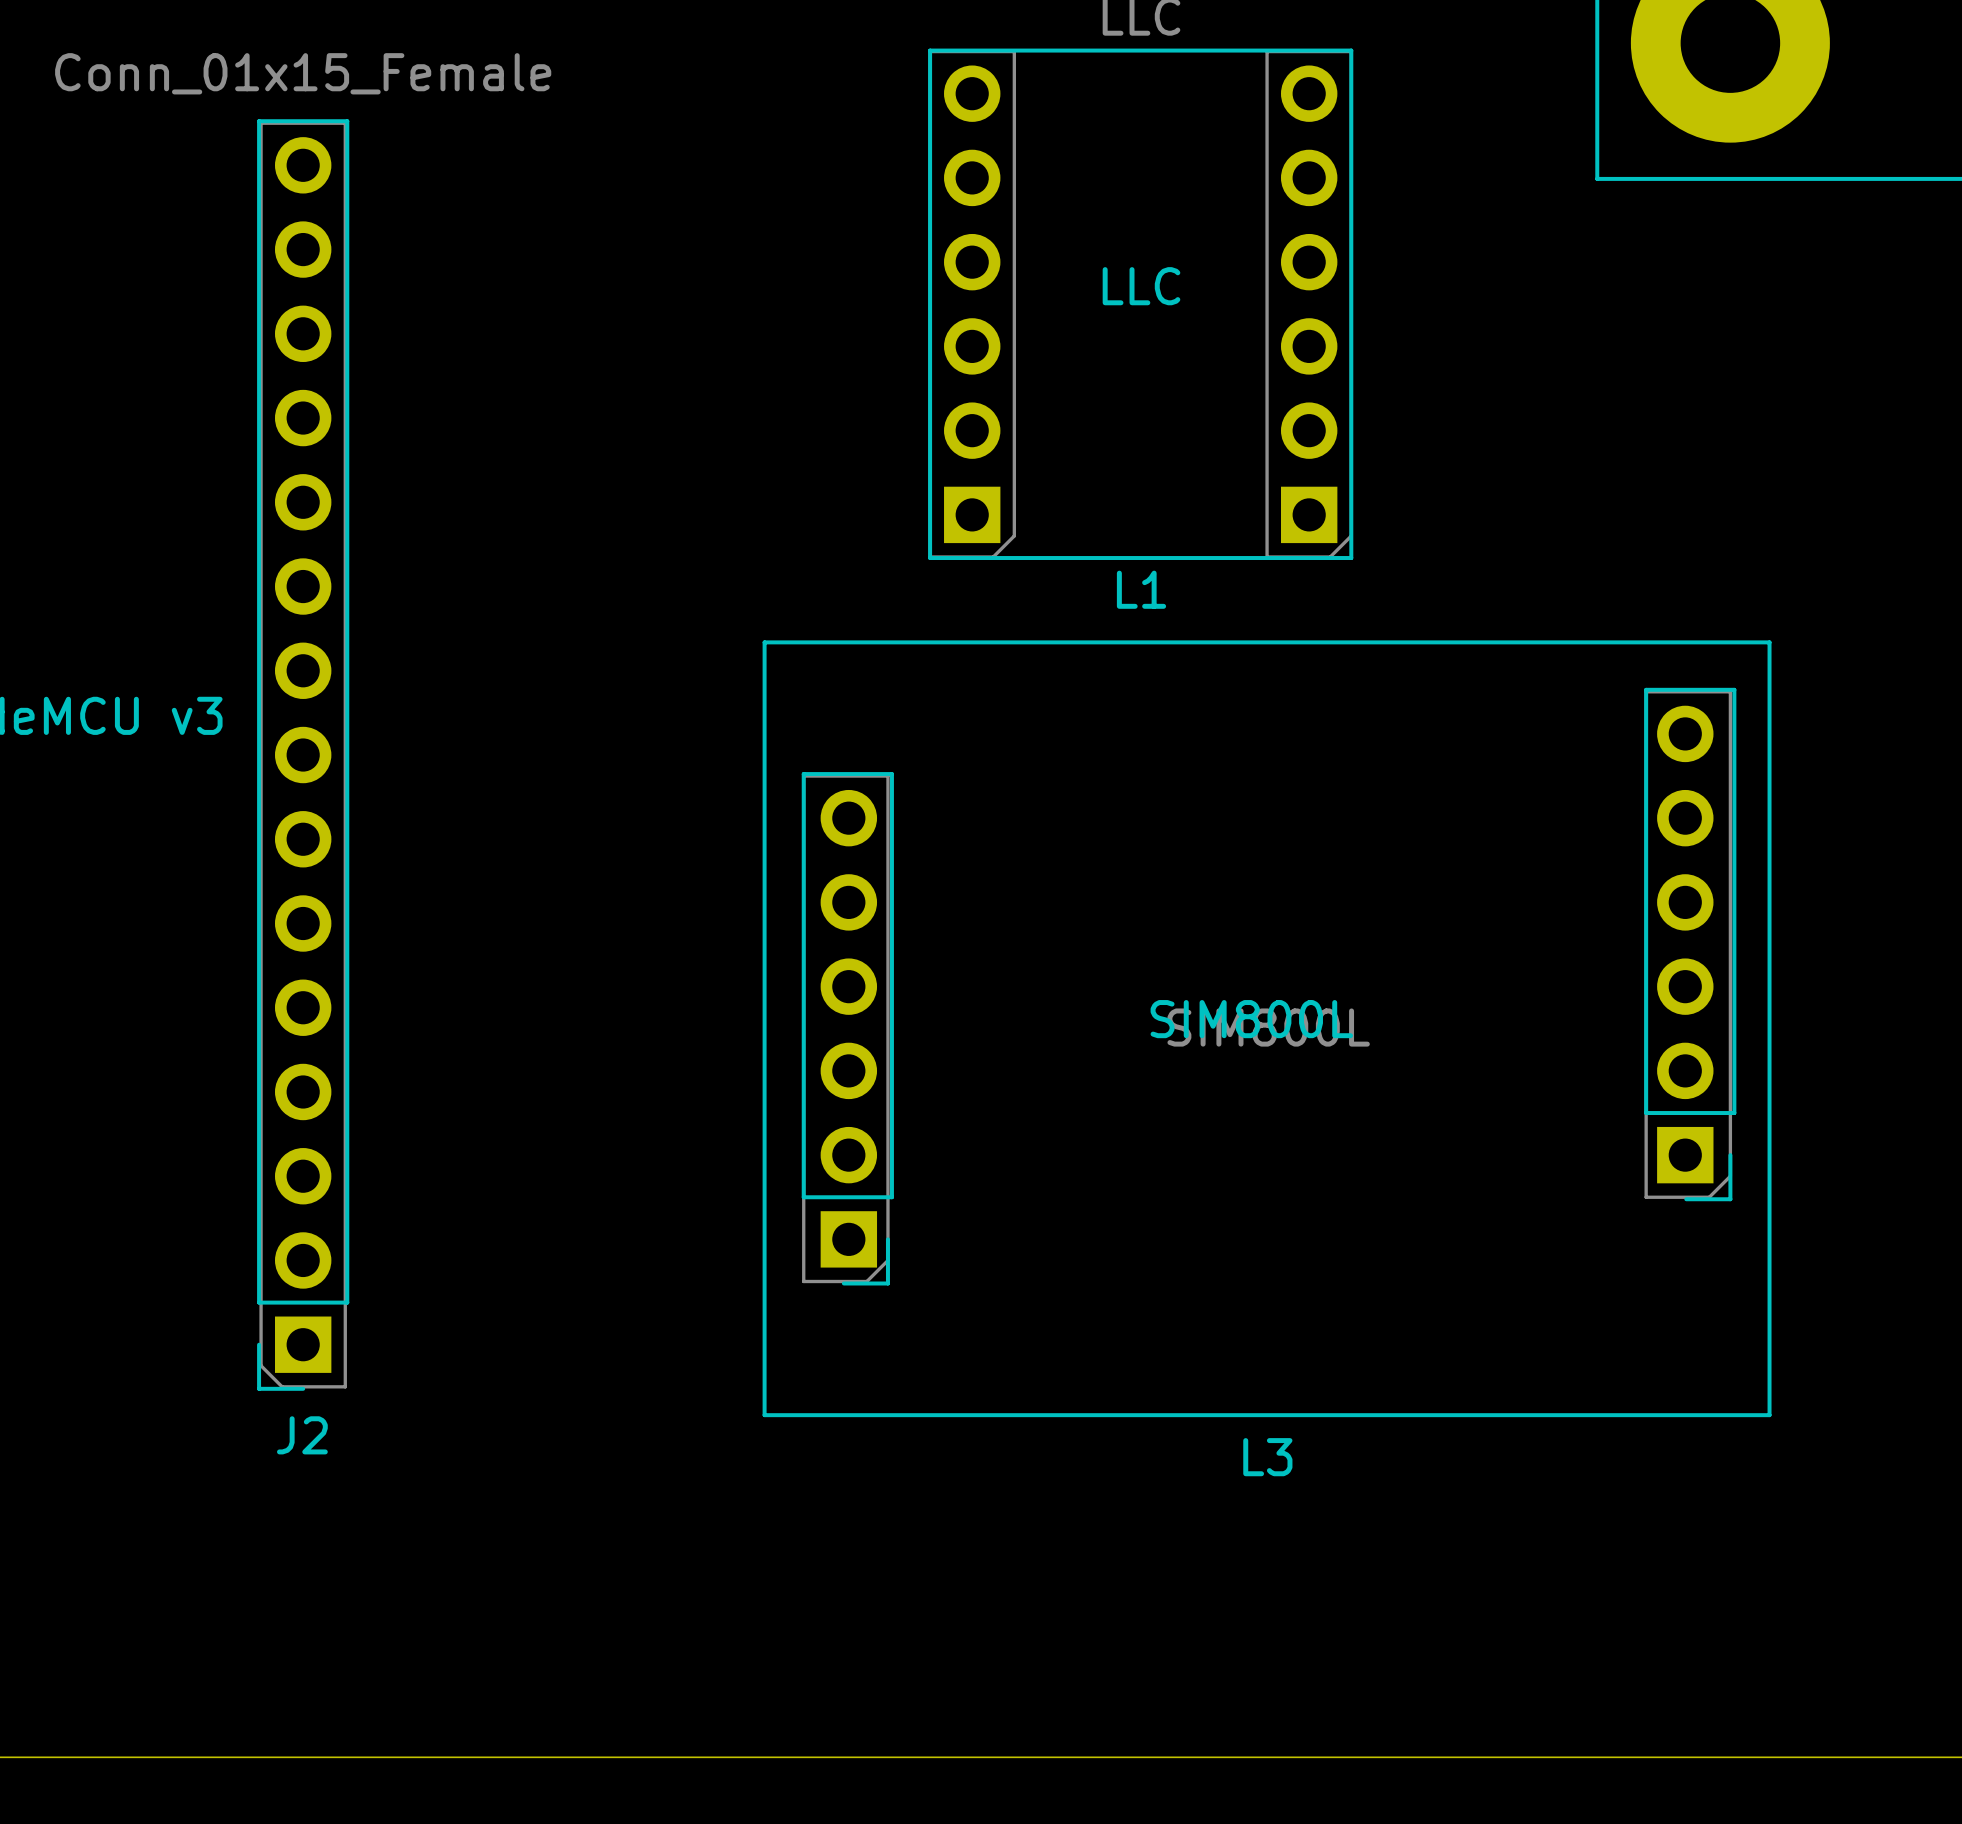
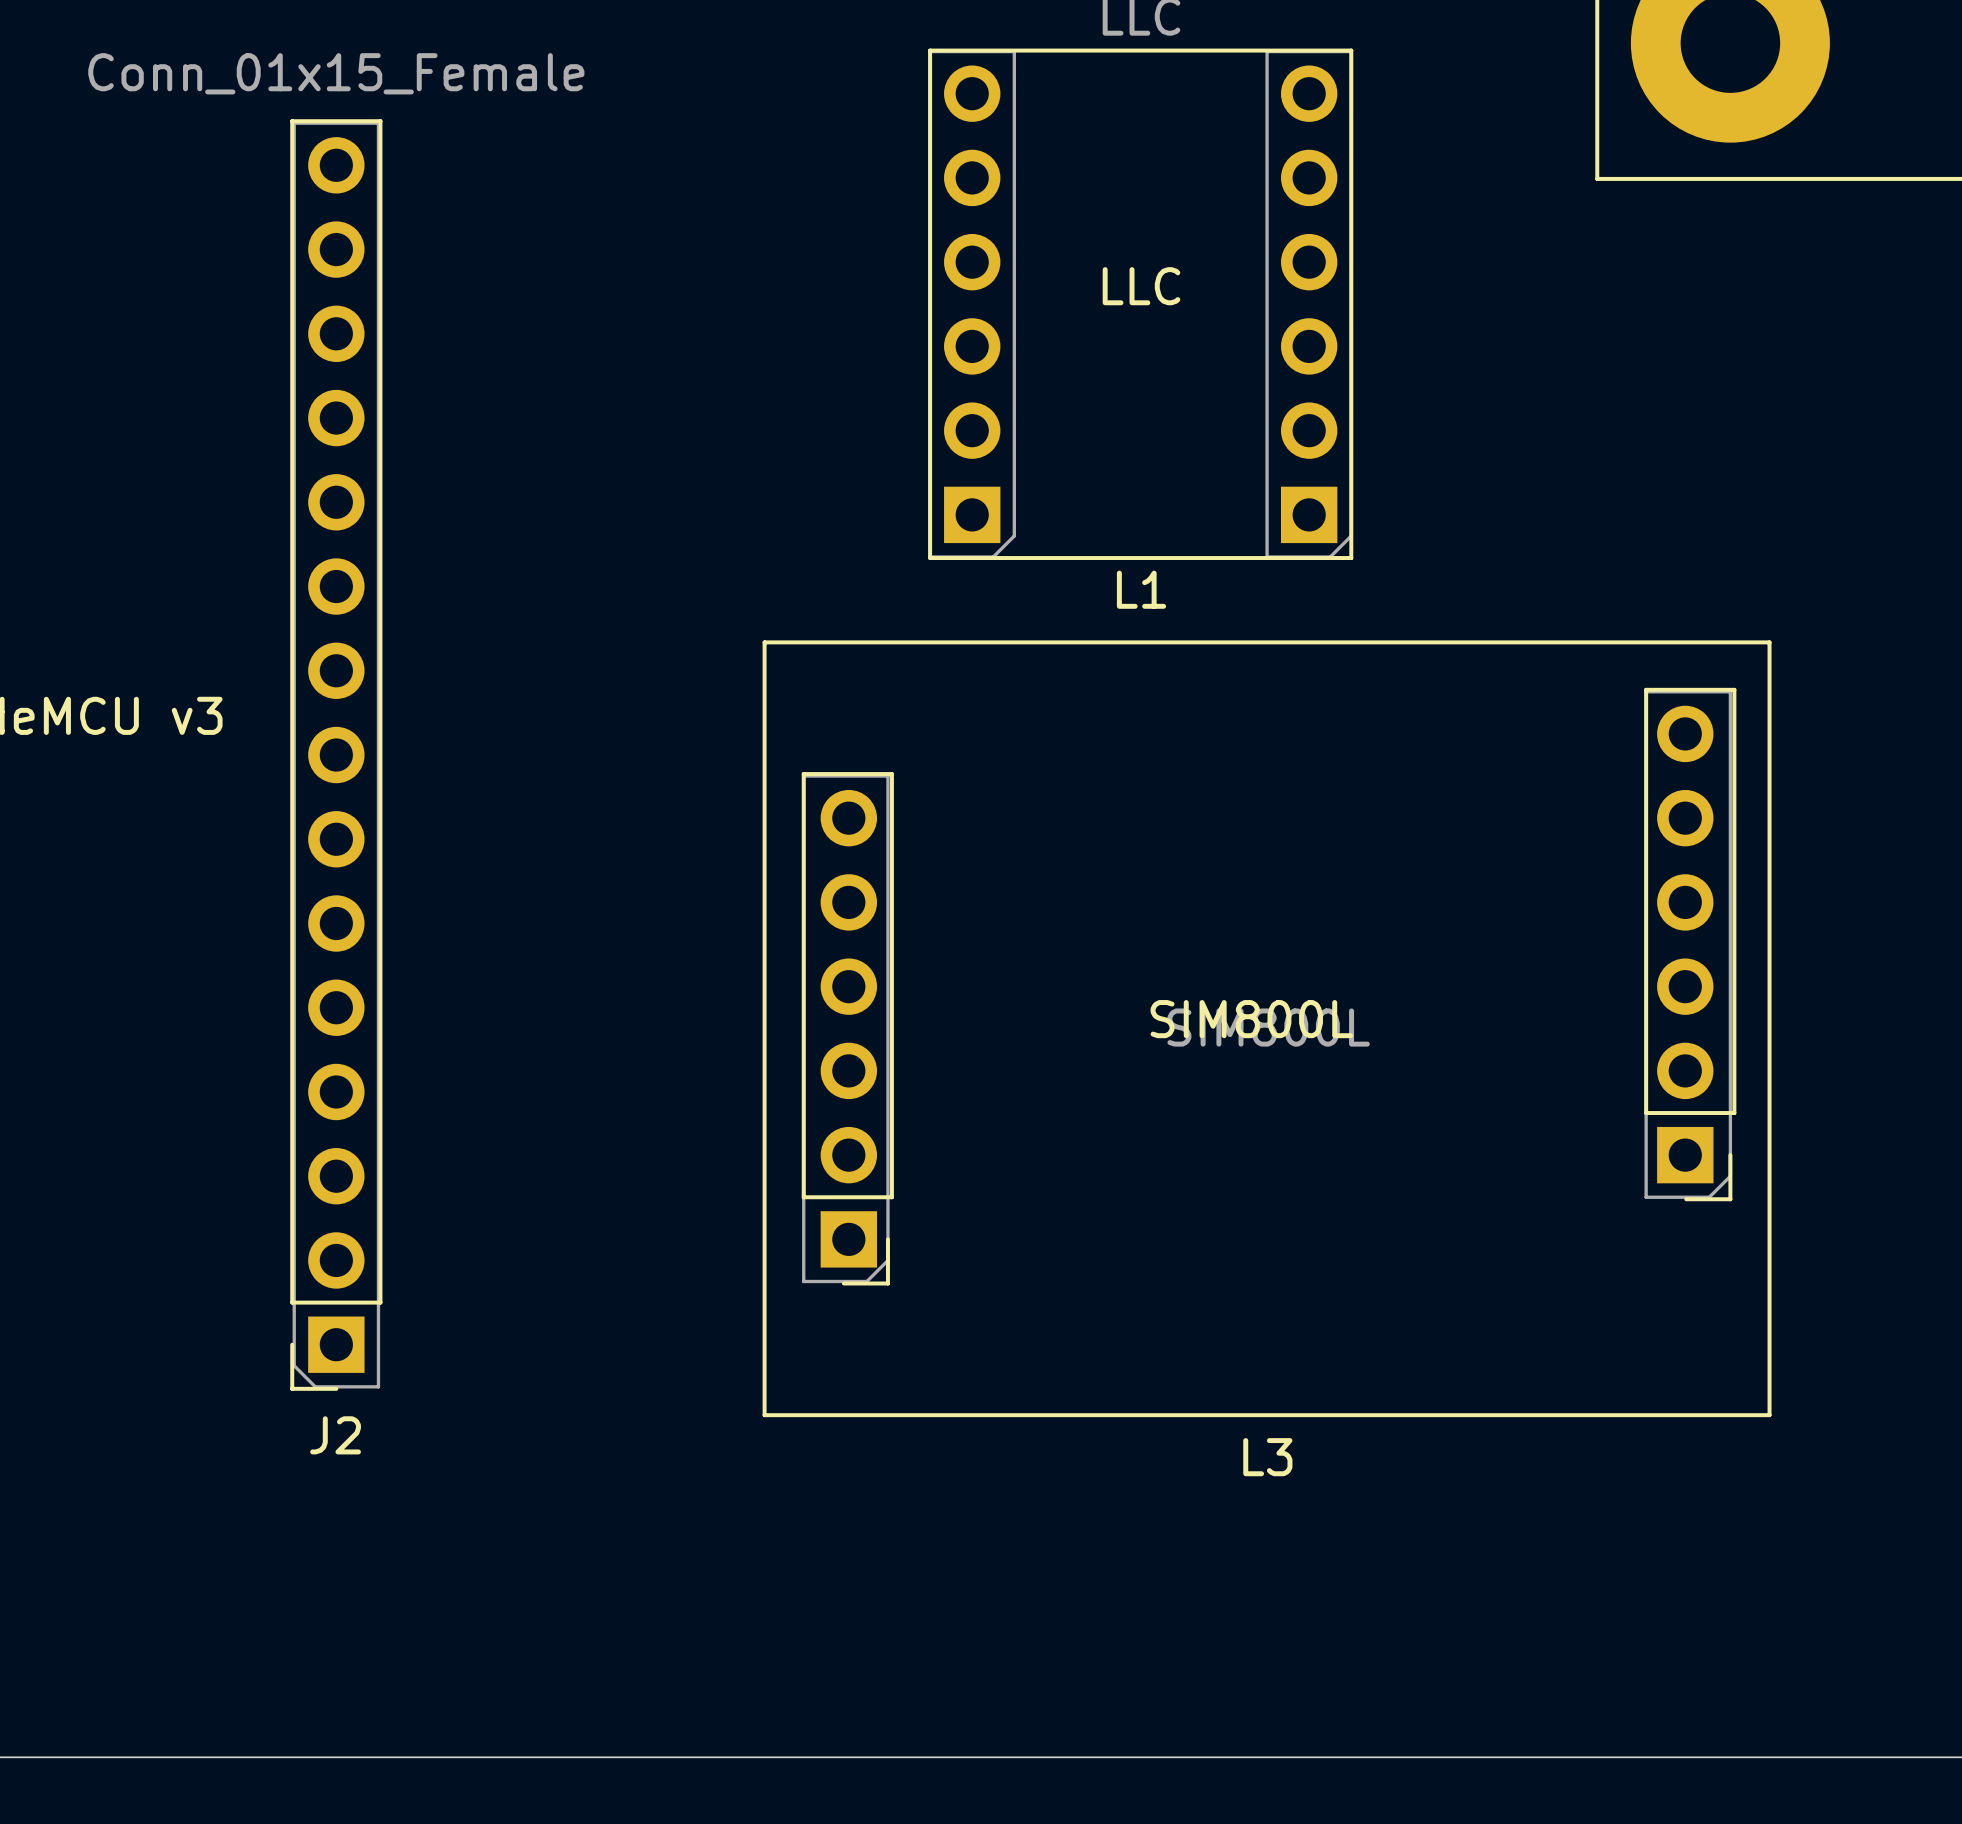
J2 position: (303, 755) -> (336, 755)

